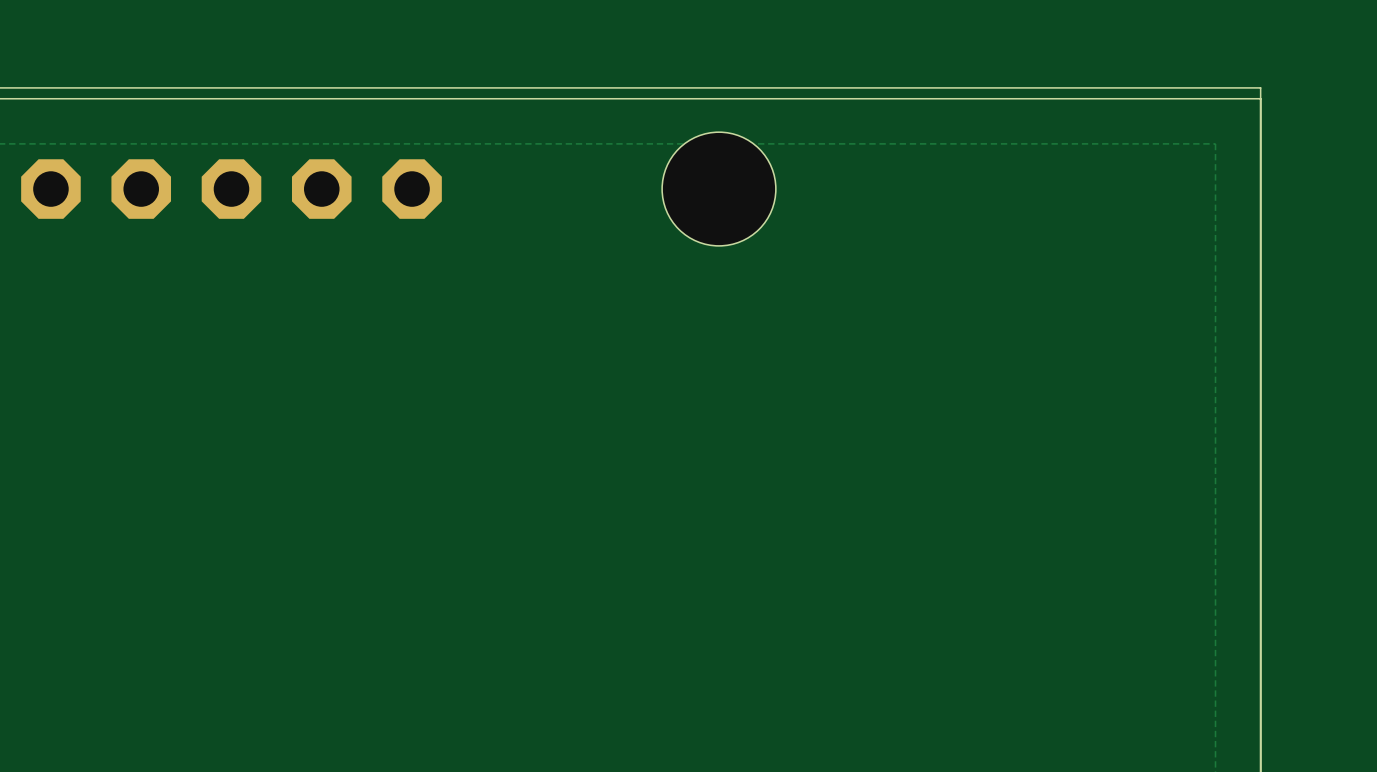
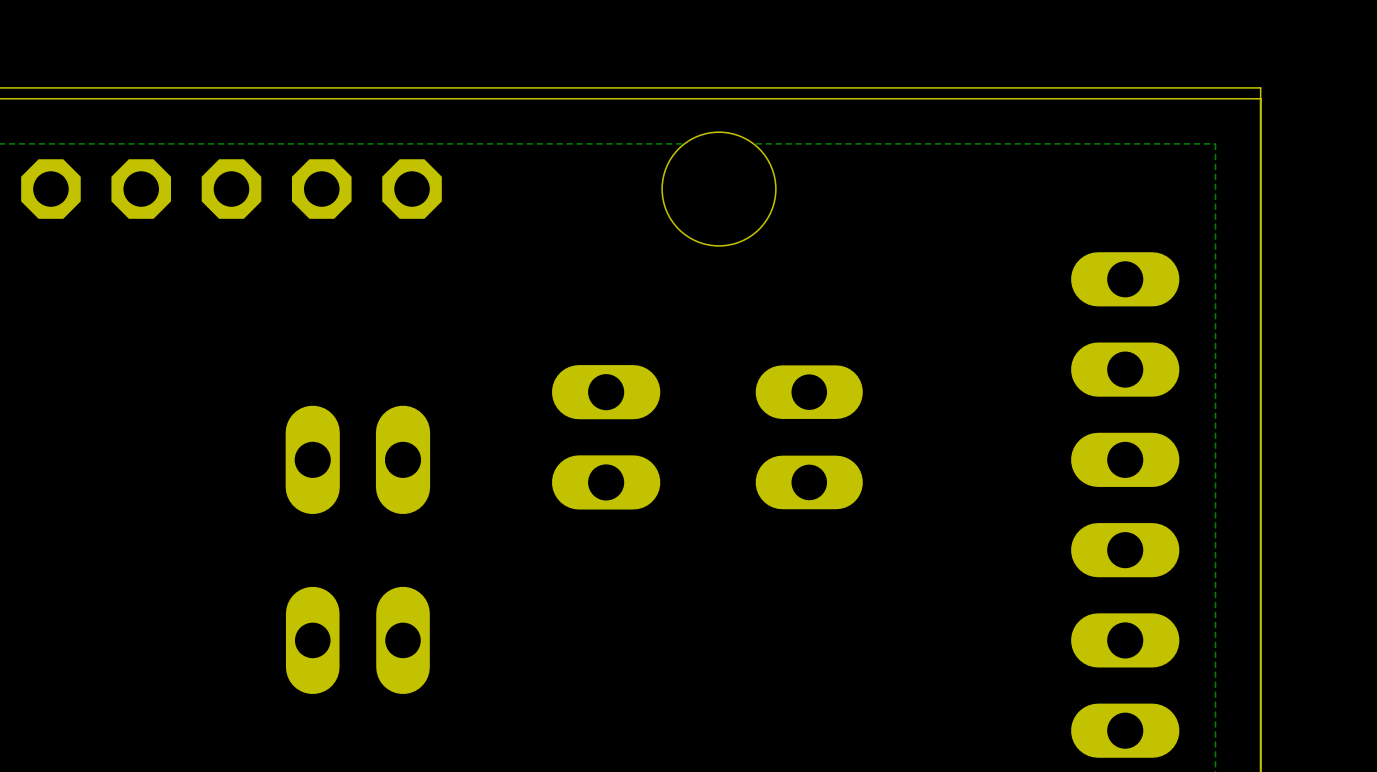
part: none -> (606, 437)
part: none -> (809, 437)
part: none -> (357, 459)
part: none -> (1125, 505)
part: none -> (357, 640)

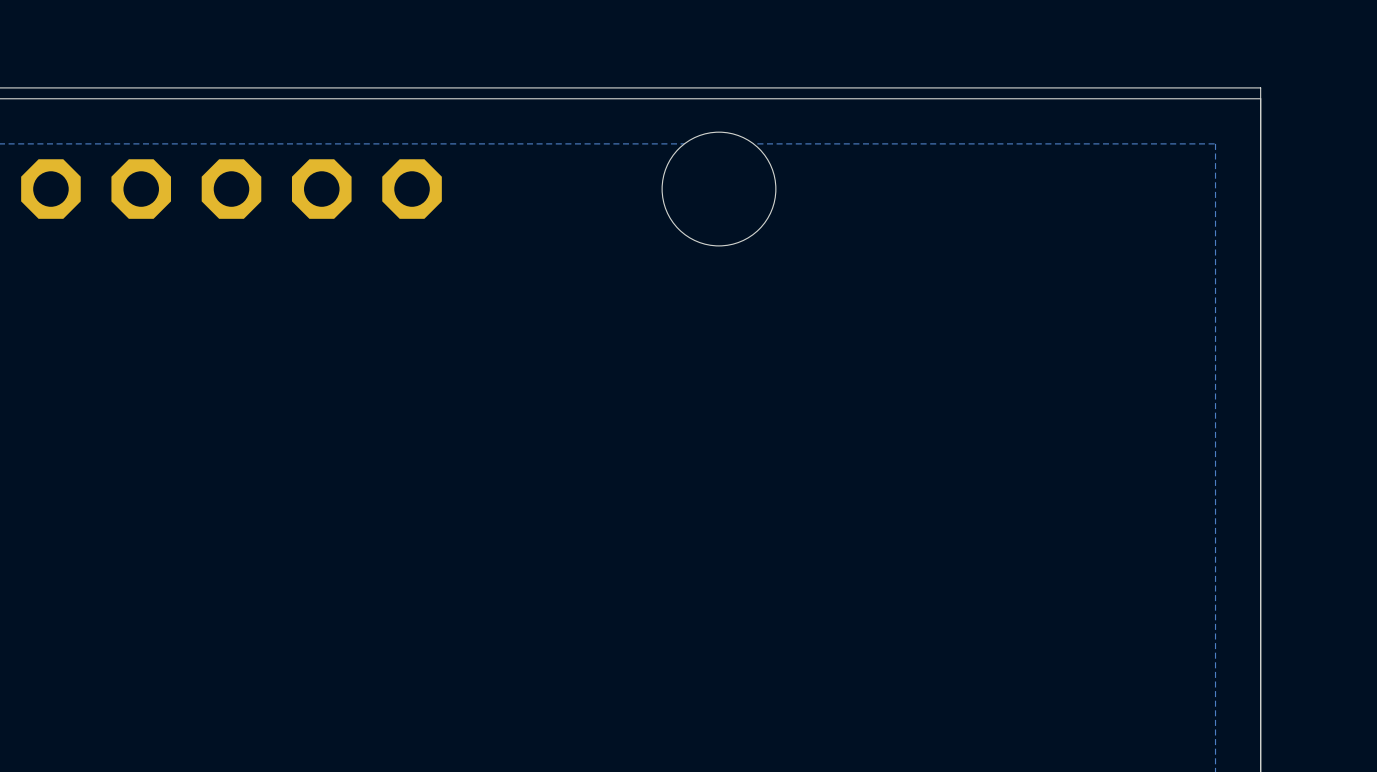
part: (606, 437) -> none
part: (809, 437) -> none
part: (357, 459) -> none
part: (1125, 505) -> none
part: (357, 640) -> none

